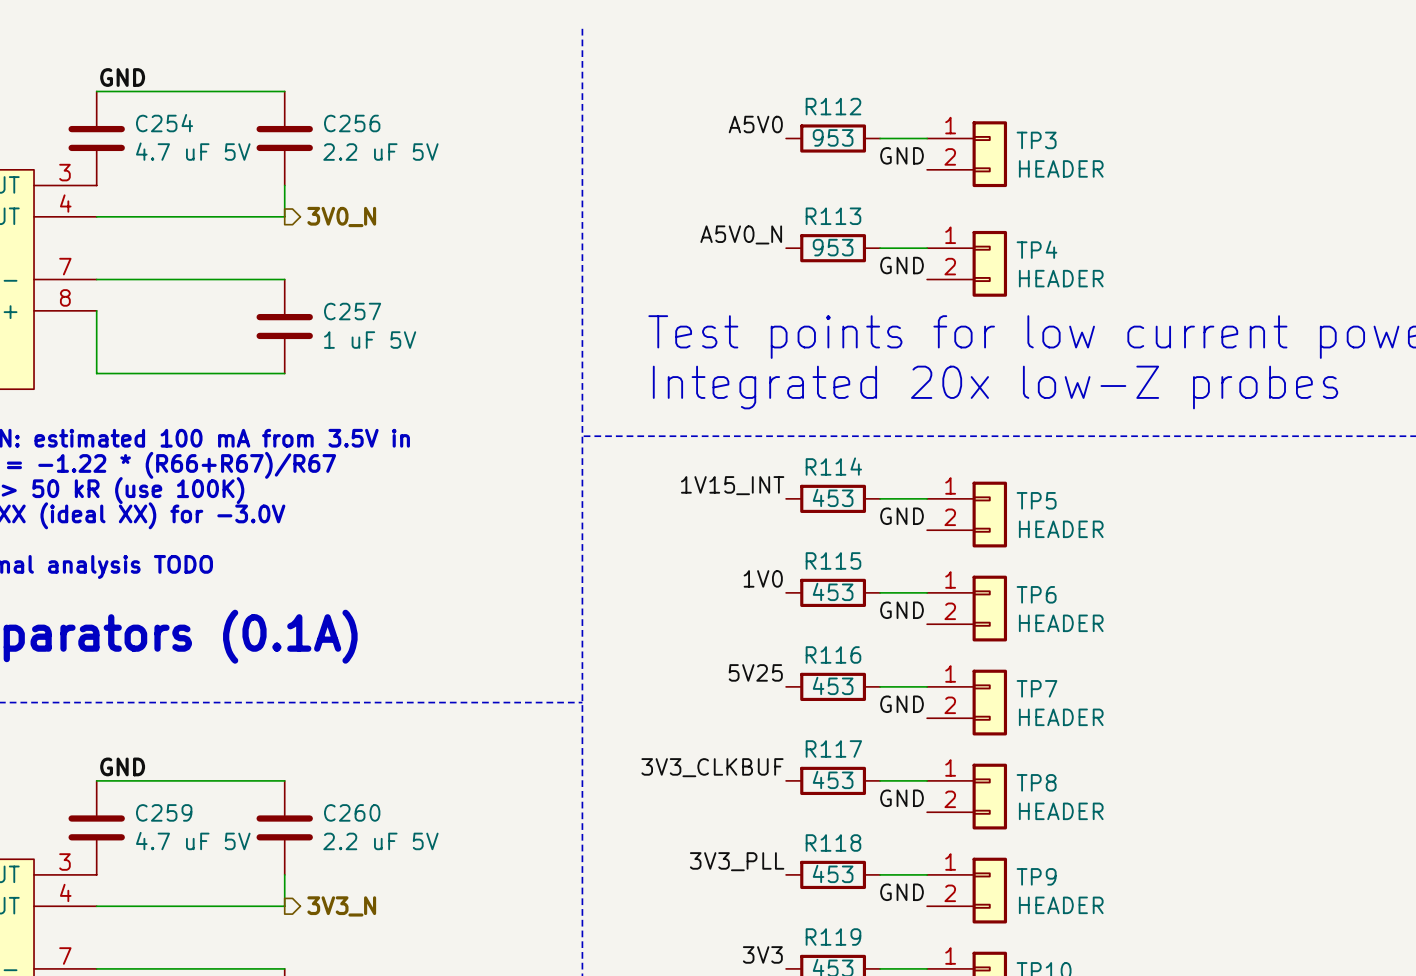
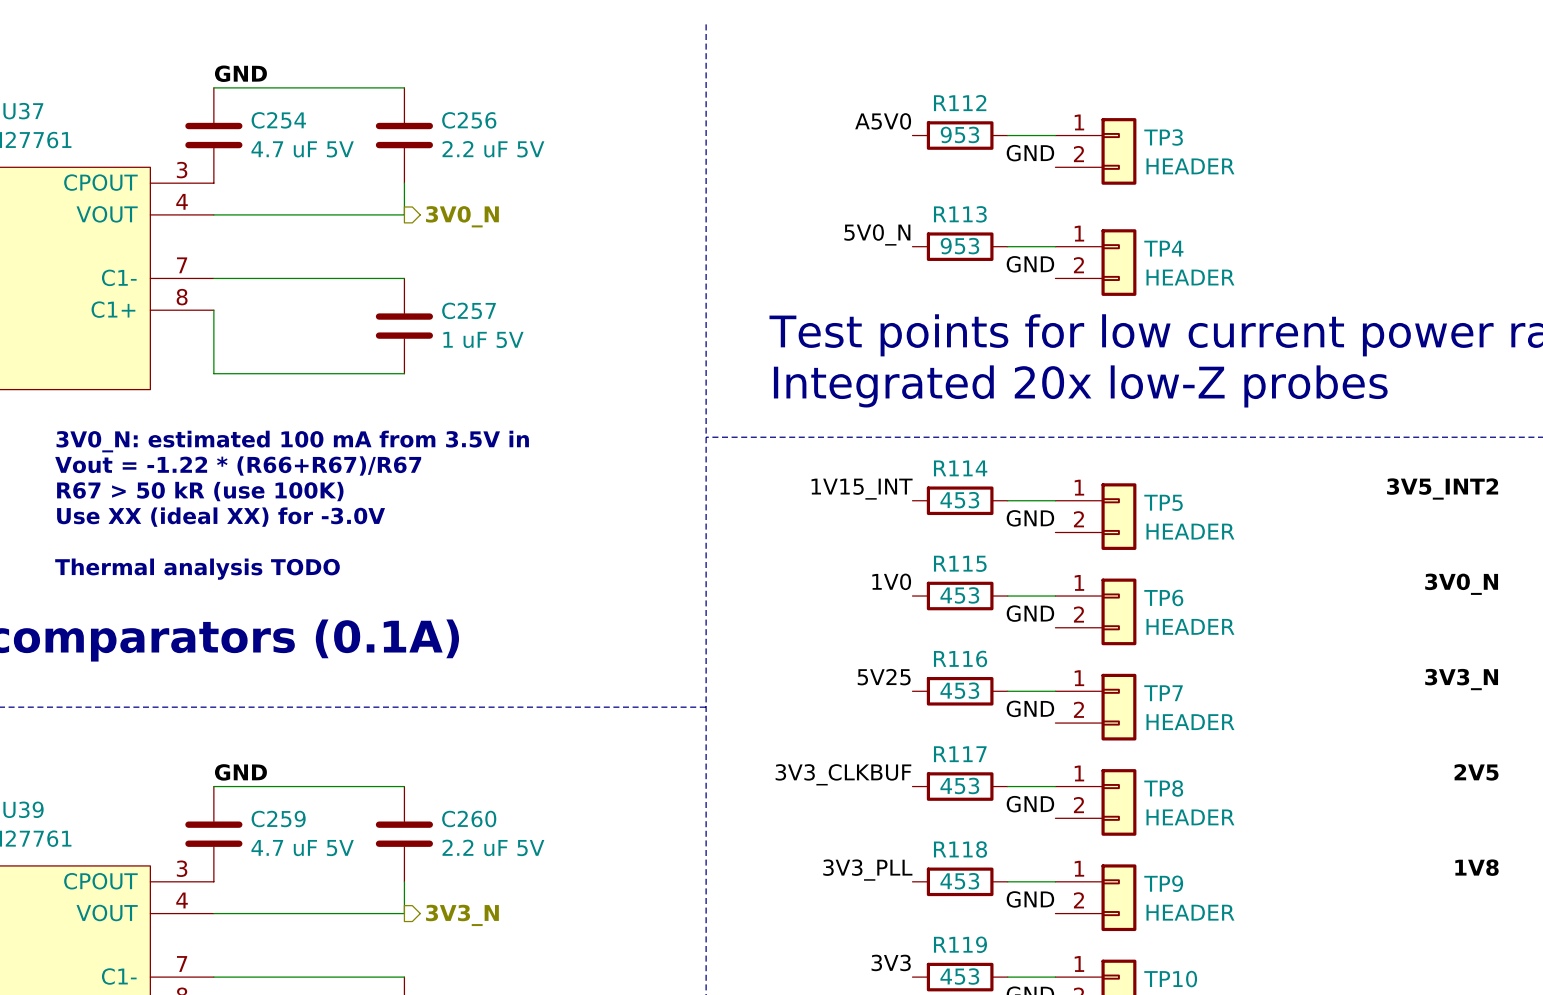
label: A5V0_N (741, 234) -> 5V0_N (877, 234)
label: none -> 3V5_INT2 (1442, 489)
label: none -> 3V0_N (1461, 584)
label: none -> 3V3_N (1461, 679)
label: none -> 2V5 (1476, 772)
label: none -> 1V8 (1477, 867)

